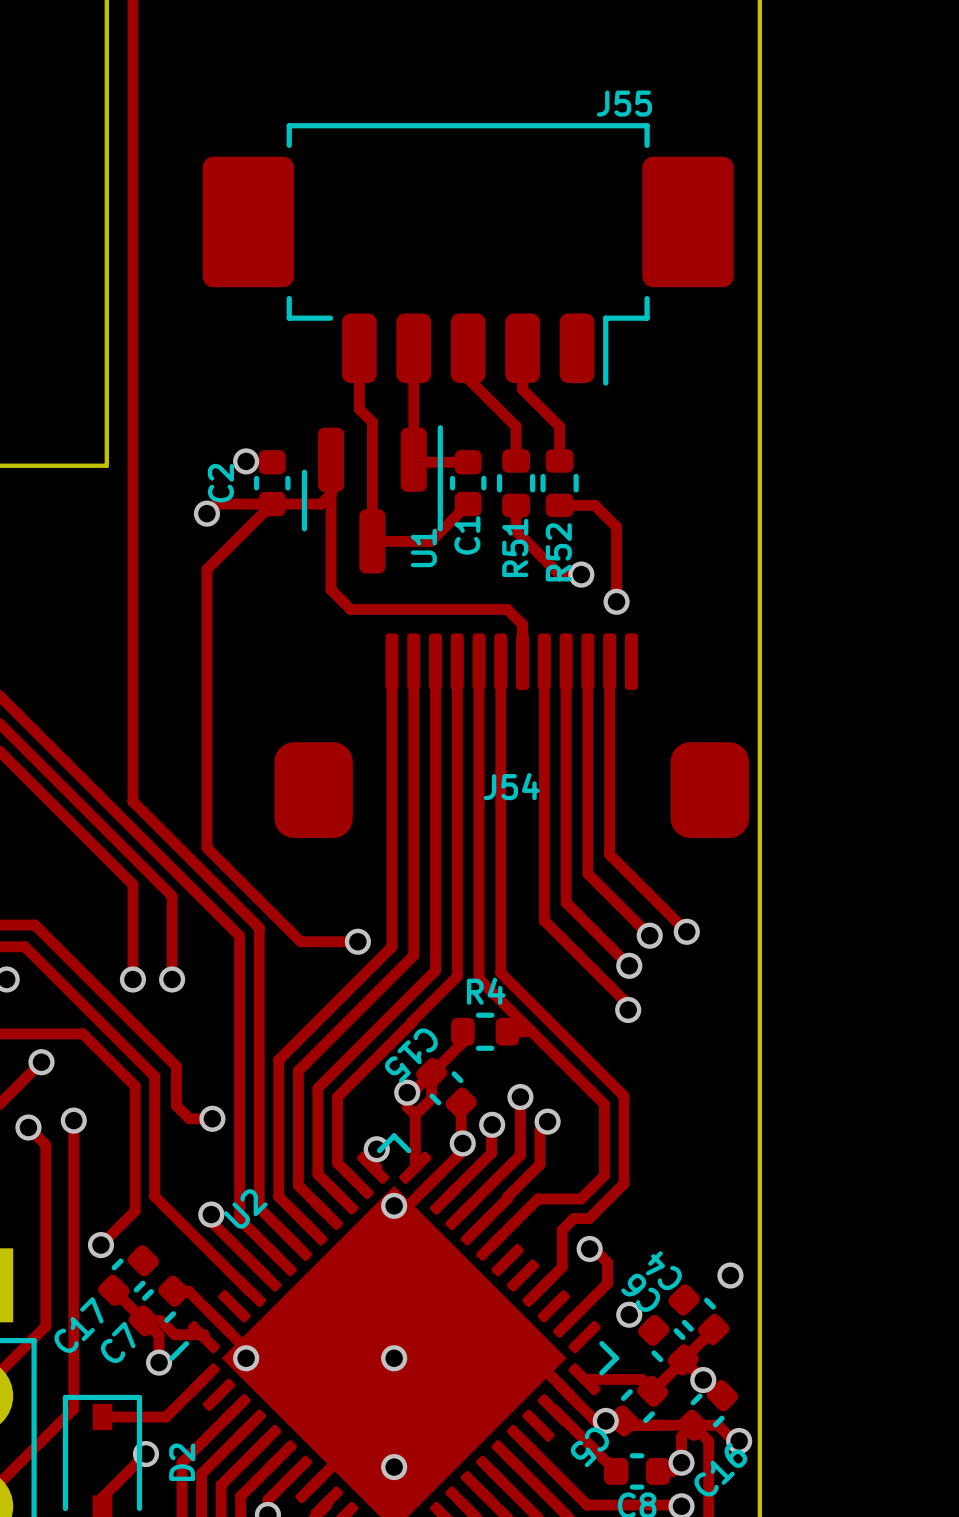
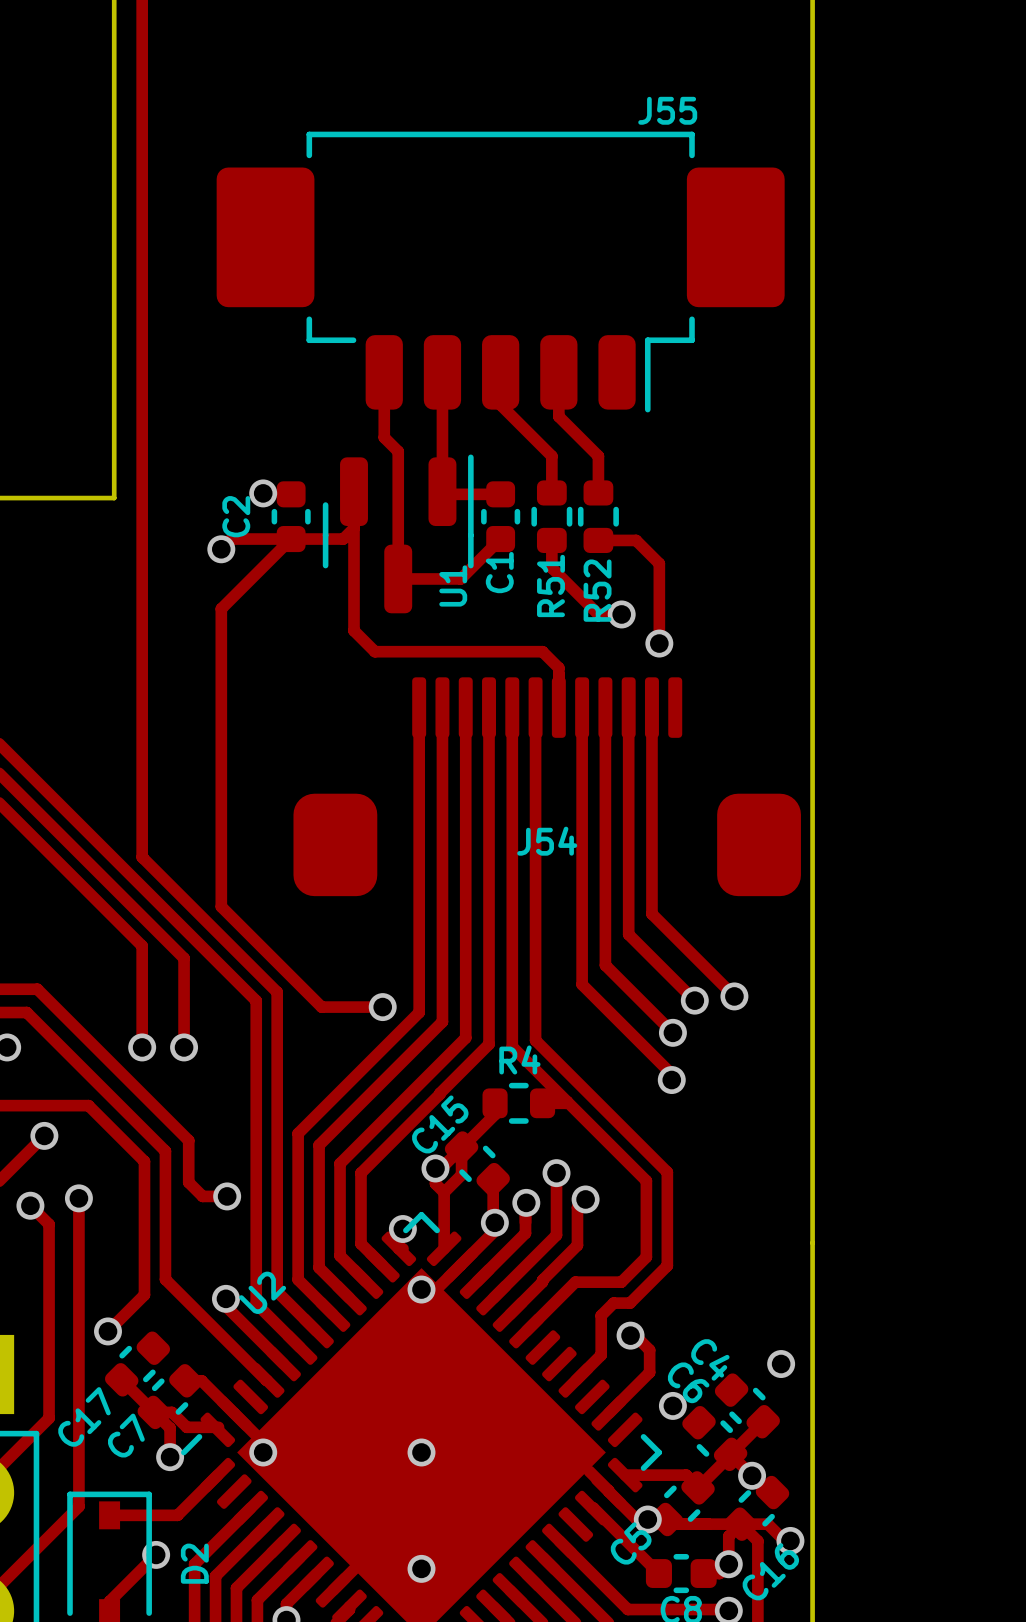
C15 name rotation: 0° (411, 1055) -> 180° (440, 1124)
C4 name rotation: 0° (663, 1270) -> 180° (710, 1359)
C6 name rotation: 0° (640, 1292) -> 180° (688, 1382)
C5 name rotation: 0° (589, 1447) -> 180° (631, 1543)

